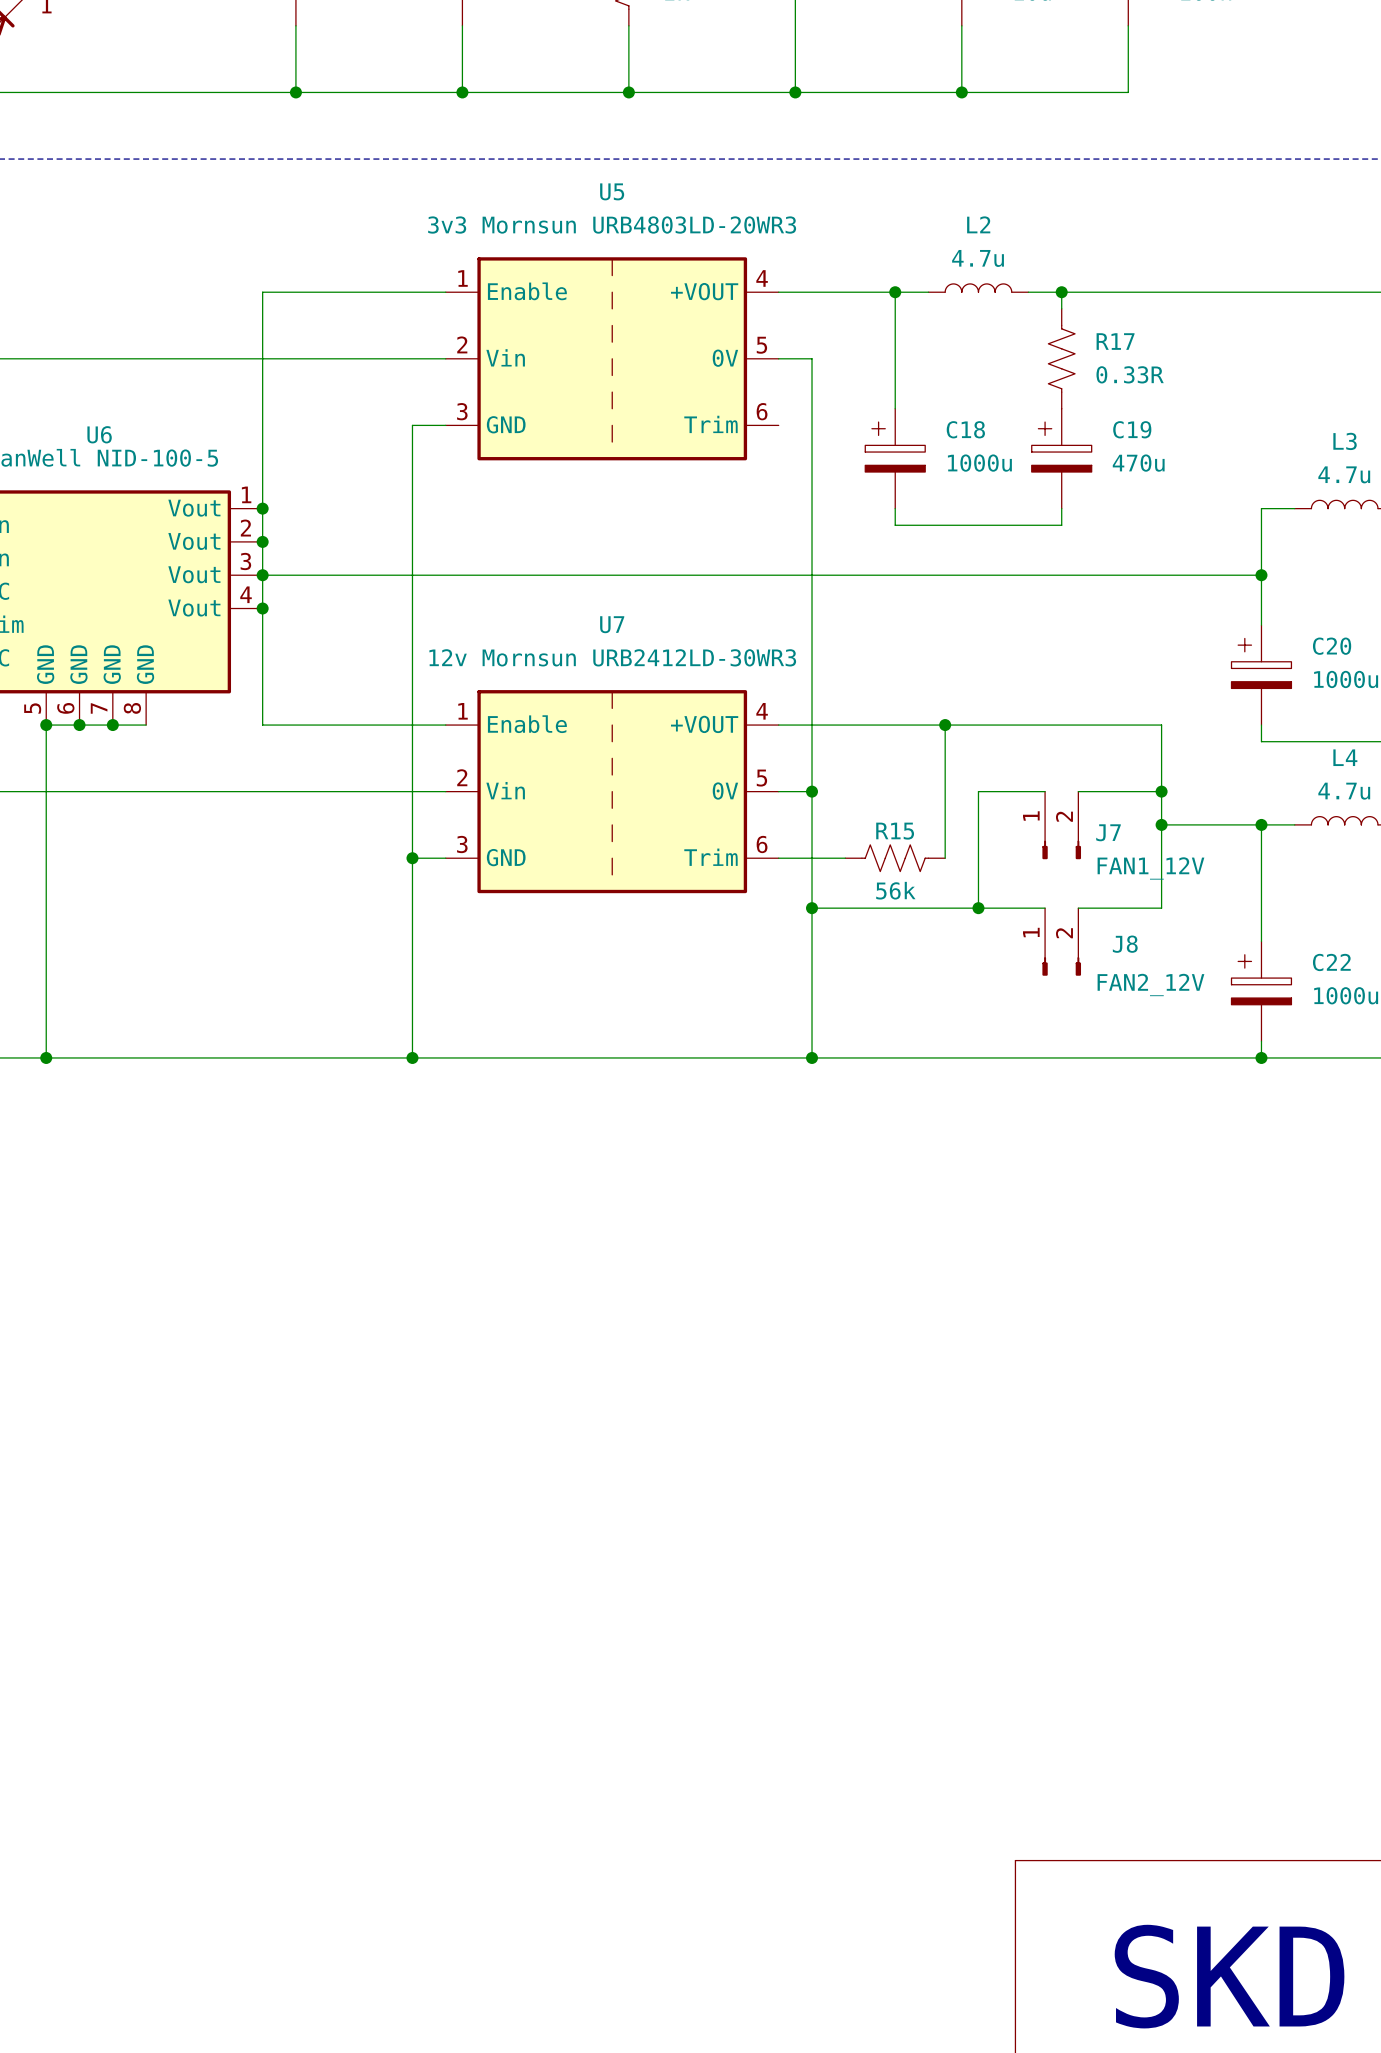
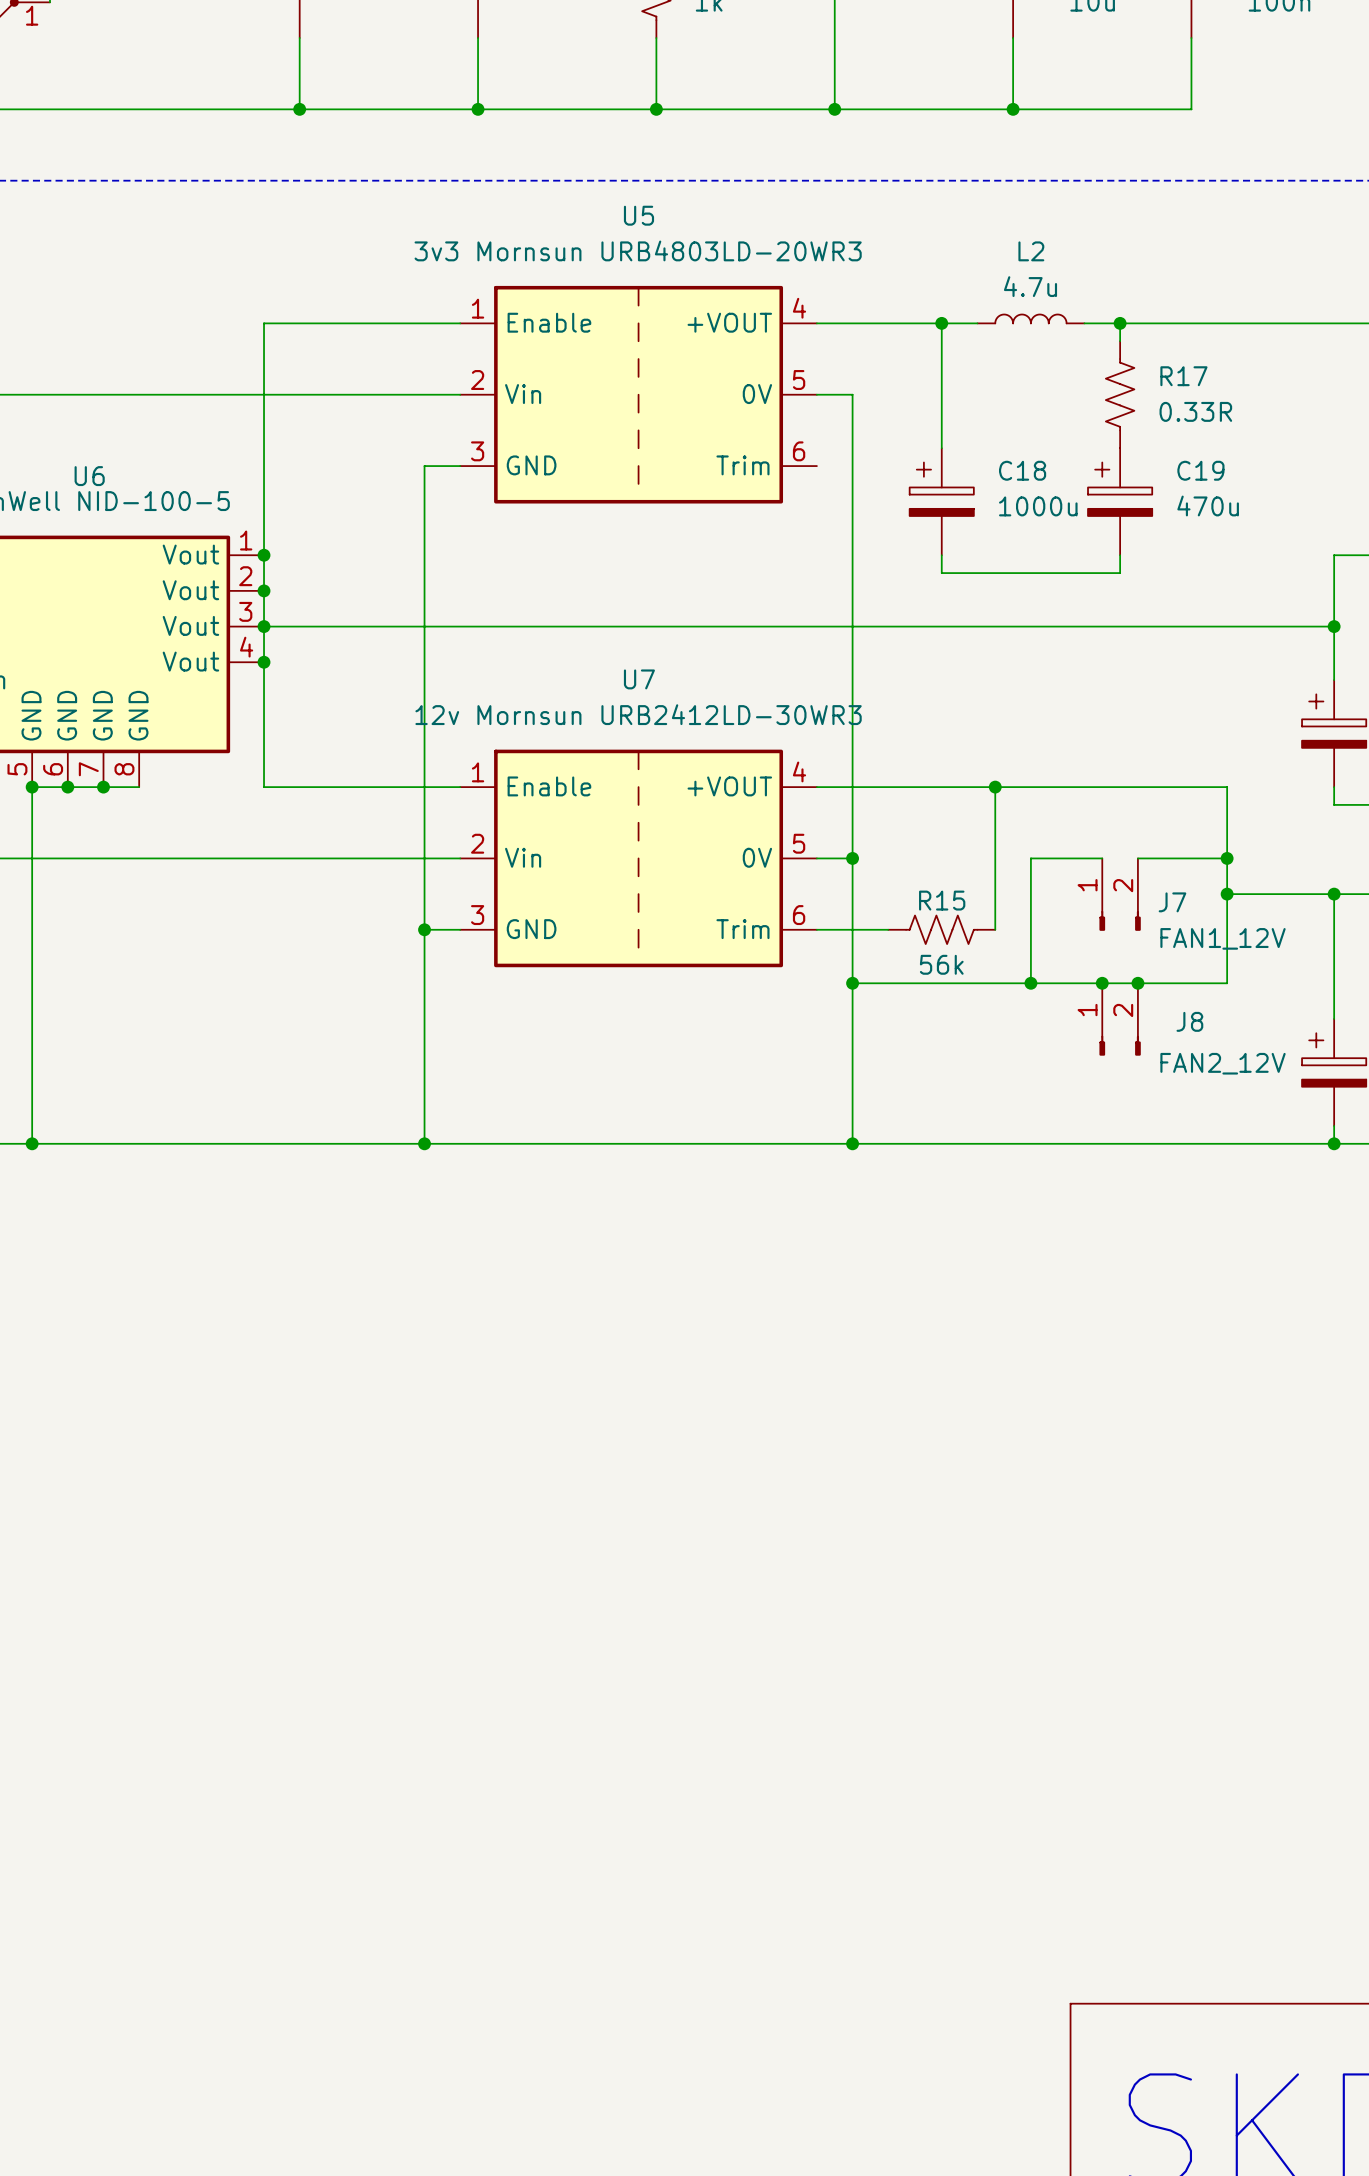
wire: none -> (1102, 983) (1137, 983)
junction: none -> (1102, 983)
junction: none -> (1137, 983)

